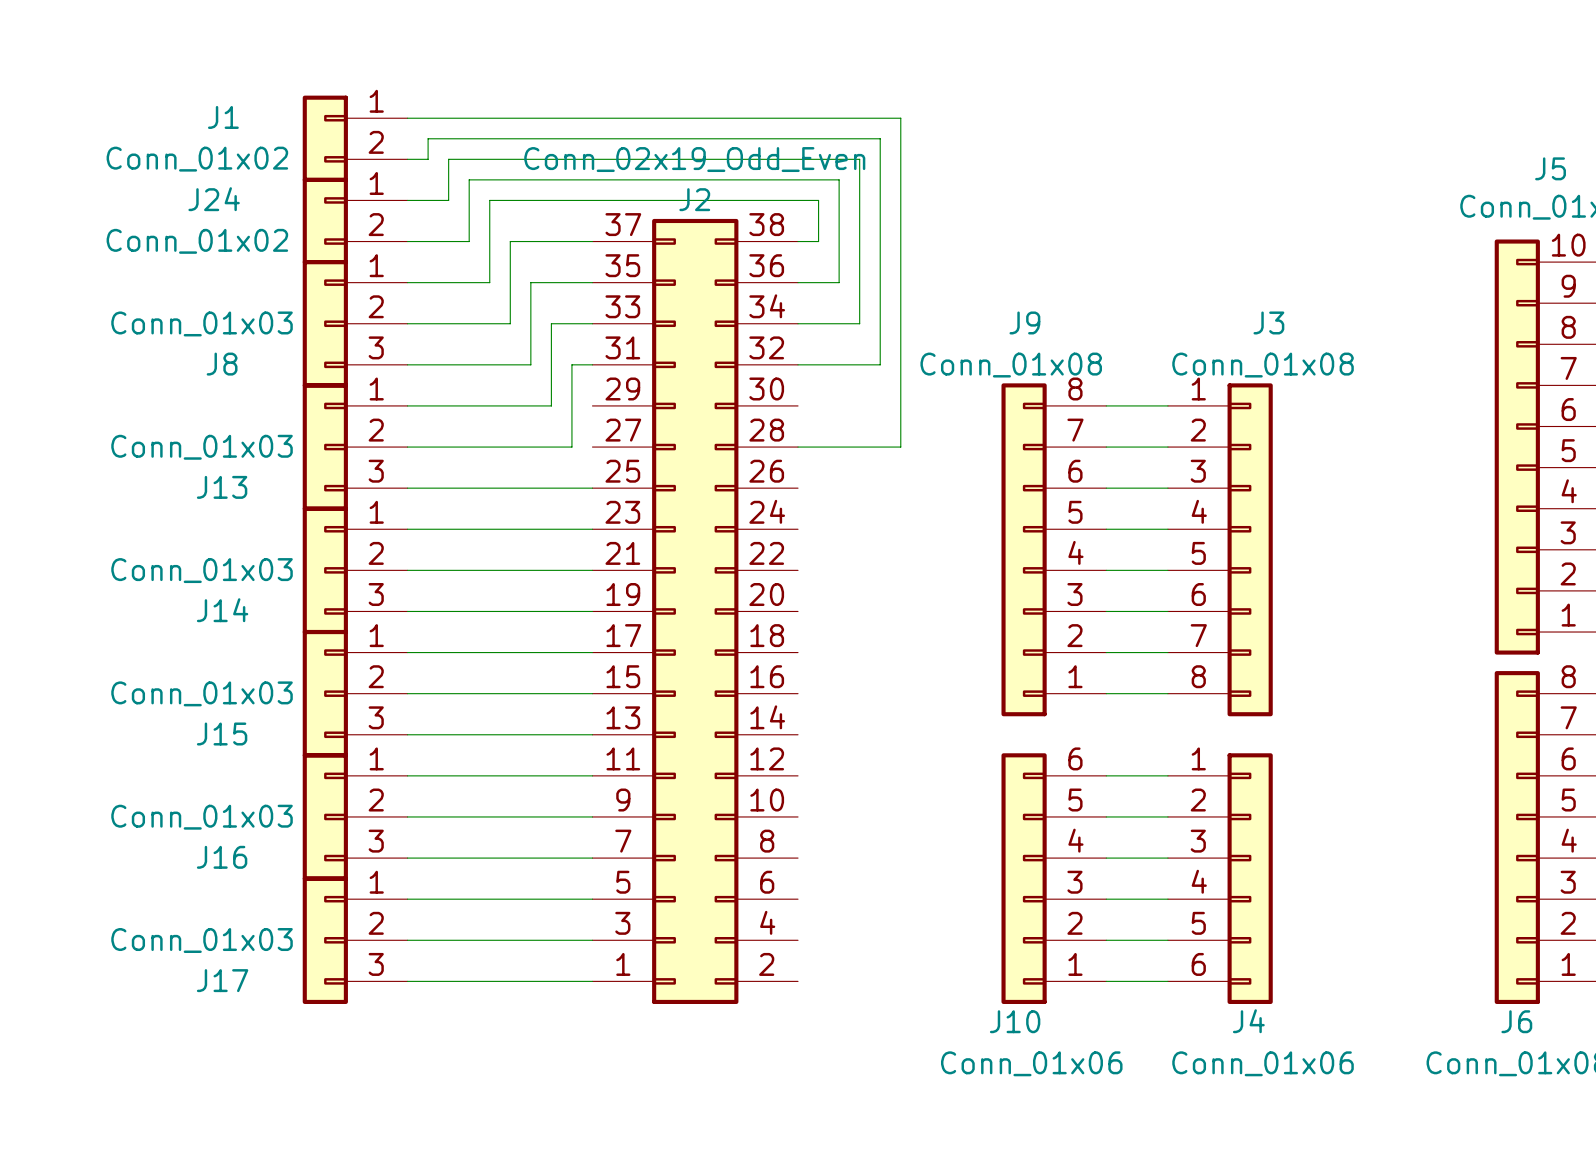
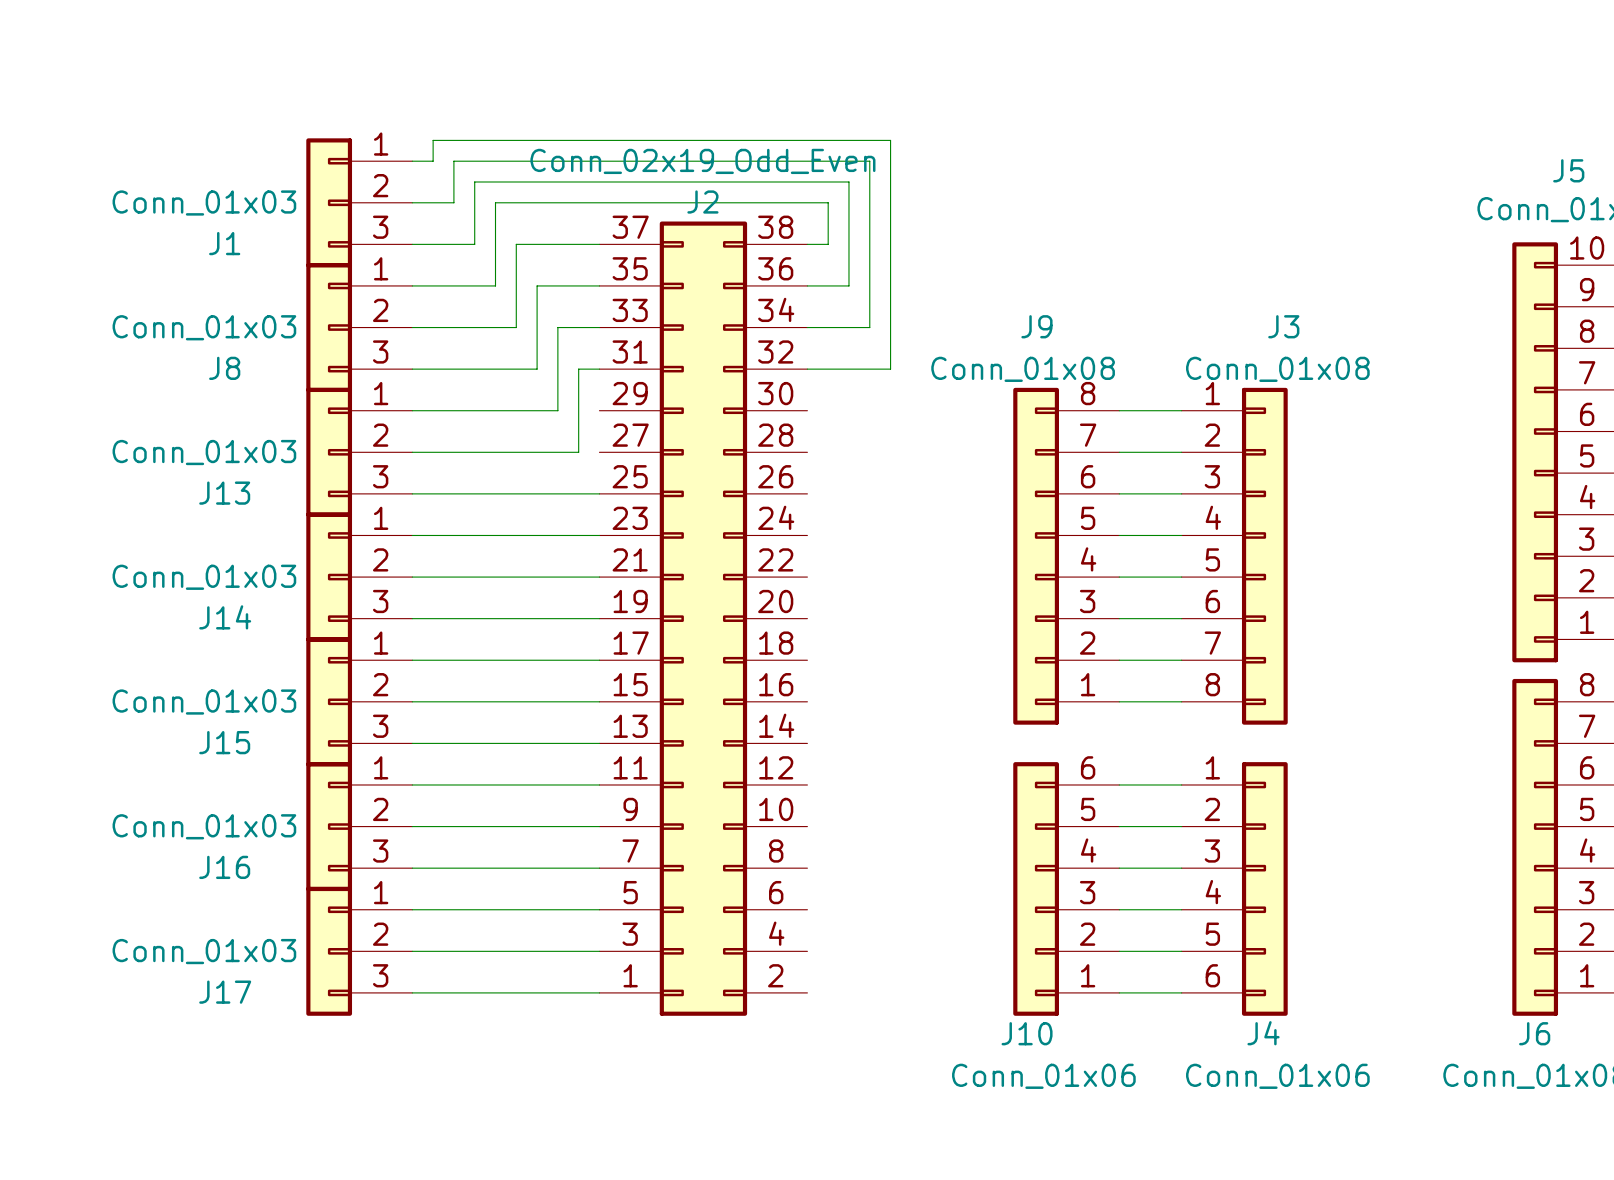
J1 symbol: [302, 95, 408, 182] -> [306, 138, 413, 268]
J1 name position: J1 (223, 117) -> J1 (224, 243)
wire: (407, 118) (900, 118) (900, 447) (798, 447) -> none
J1 value: Conn_01x02 (197, 159) -> Conn_01x03 (204, 203)
J24: Conn_01x02 (355, 220) -> none

